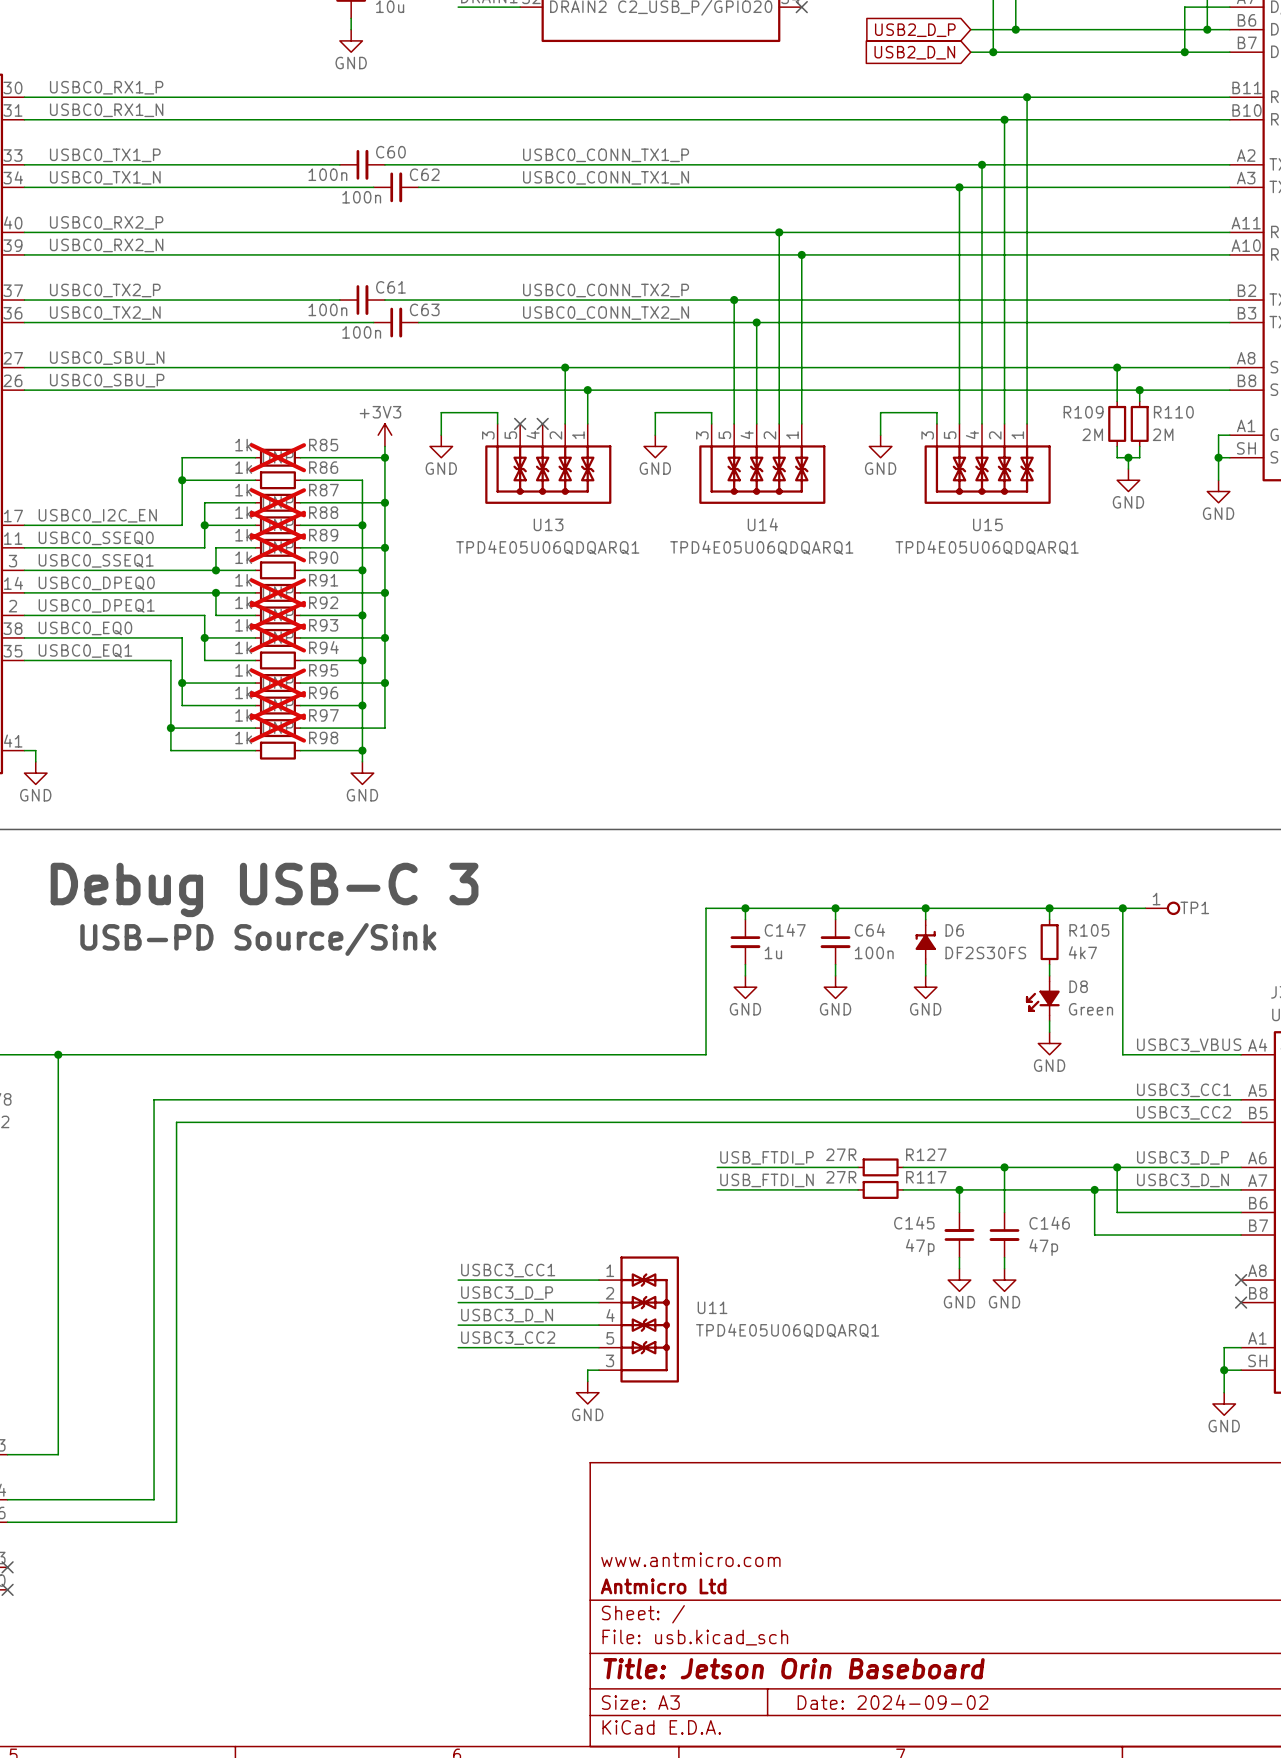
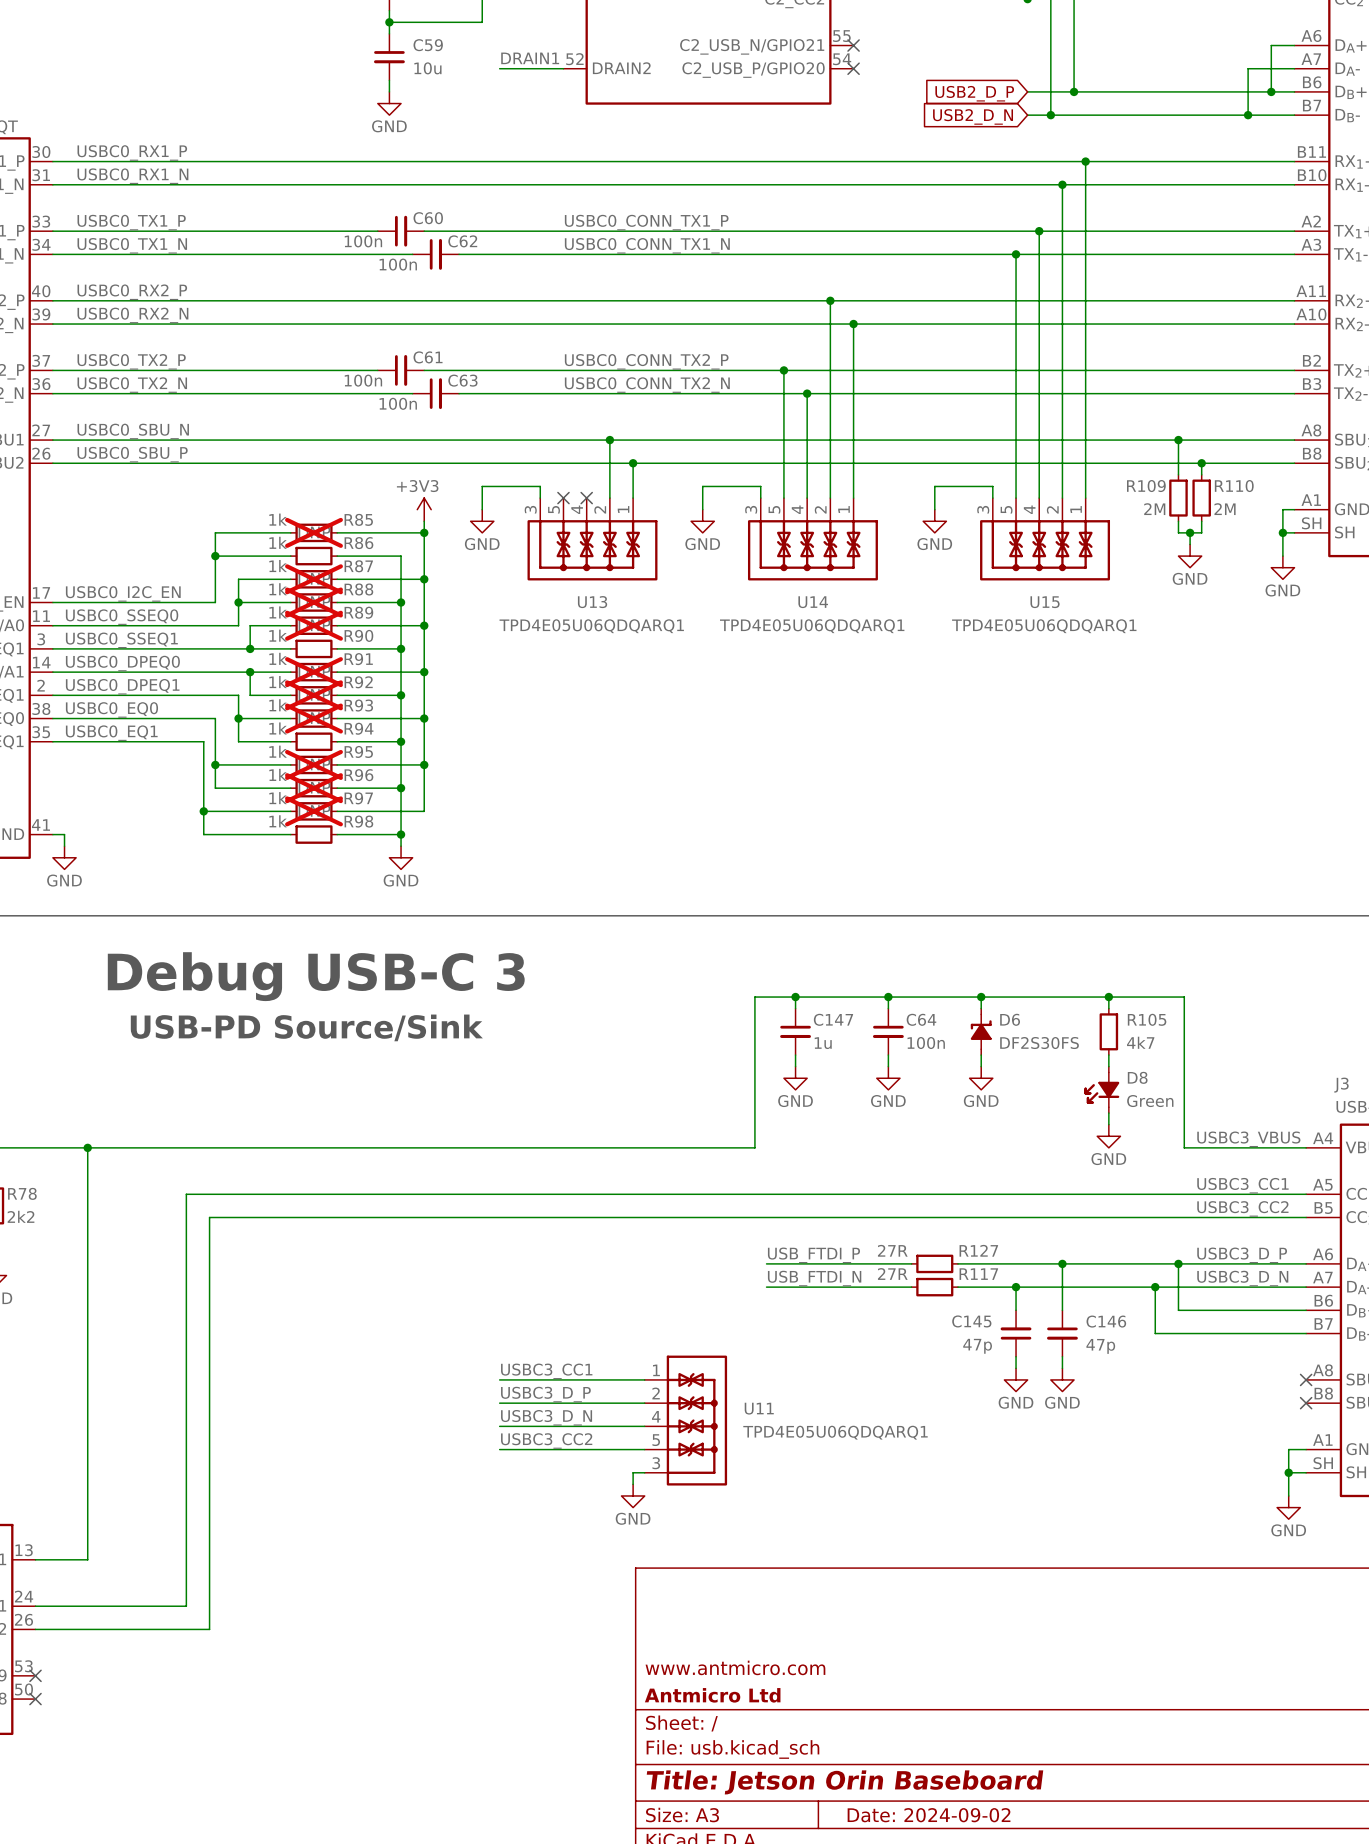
wire: (1122, 908) (1145, 908) -> none
junction: (1122, 908) -> none
TP1: (1162, 908) -> none

